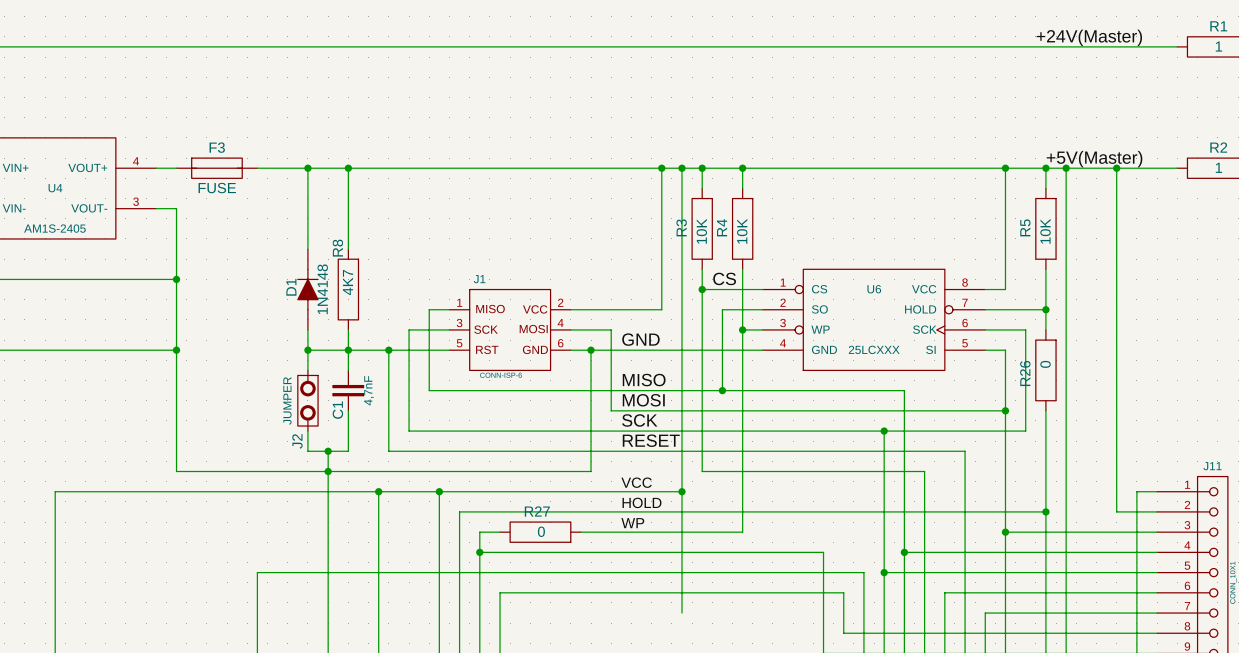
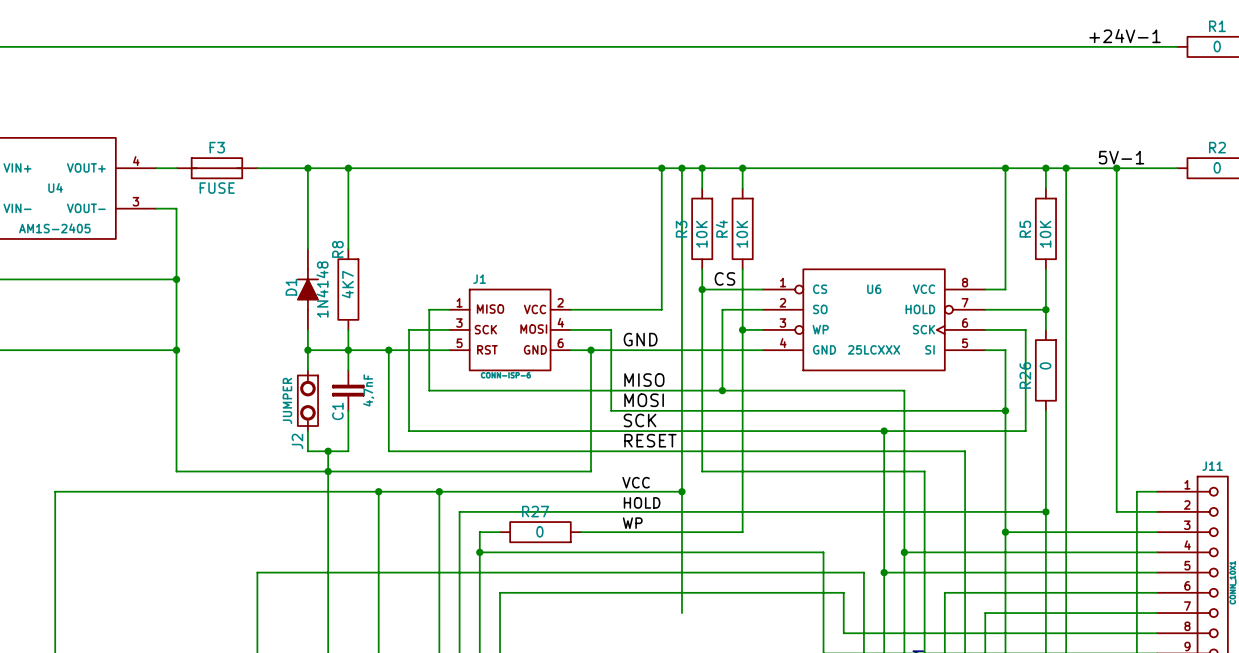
label: none -> +24V-1 (1125, 36)
label: +24V(Master) (1089, 37) -> none
R1 value: 1 (1218, 46) -> 0 (1217, 46)
label: none -> 5V-1 (1121, 157)
label: +5V(Master) (1094, 159) -> none
R2 value: 1 (1218, 167) -> 0 (1217, 167)

